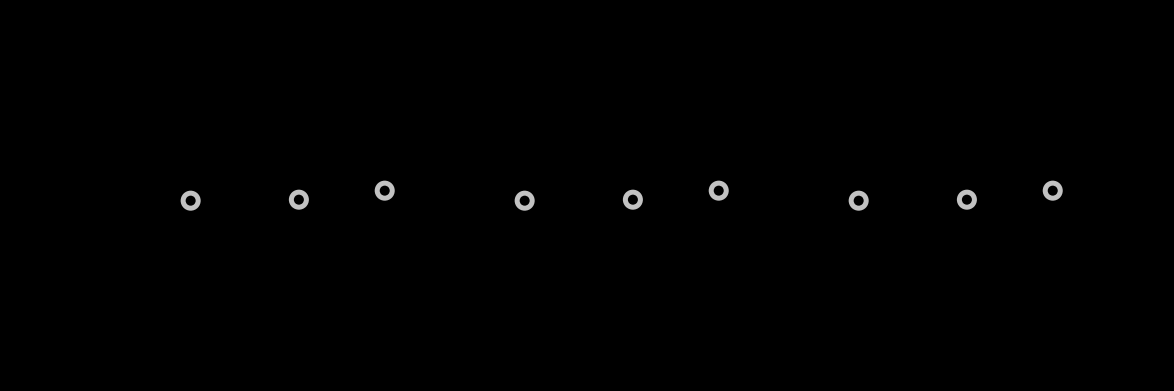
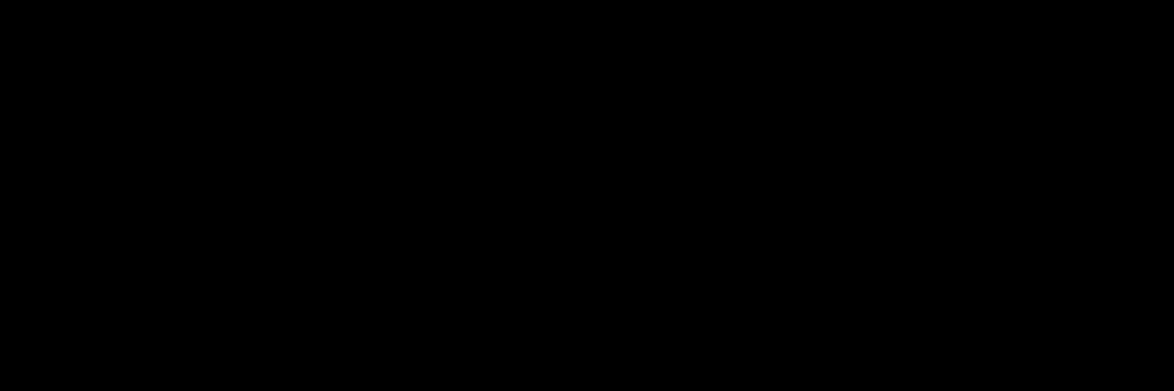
via: (384, 190) -> none
via: (718, 190) -> none
via: (1052, 190) -> none
via: (298, 199) -> none
via: (632, 199) -> none
via: (966, 199) -> none
via: (190, 200) -> none
via: (524, 200) -> none
via: (858, 200) -> none

